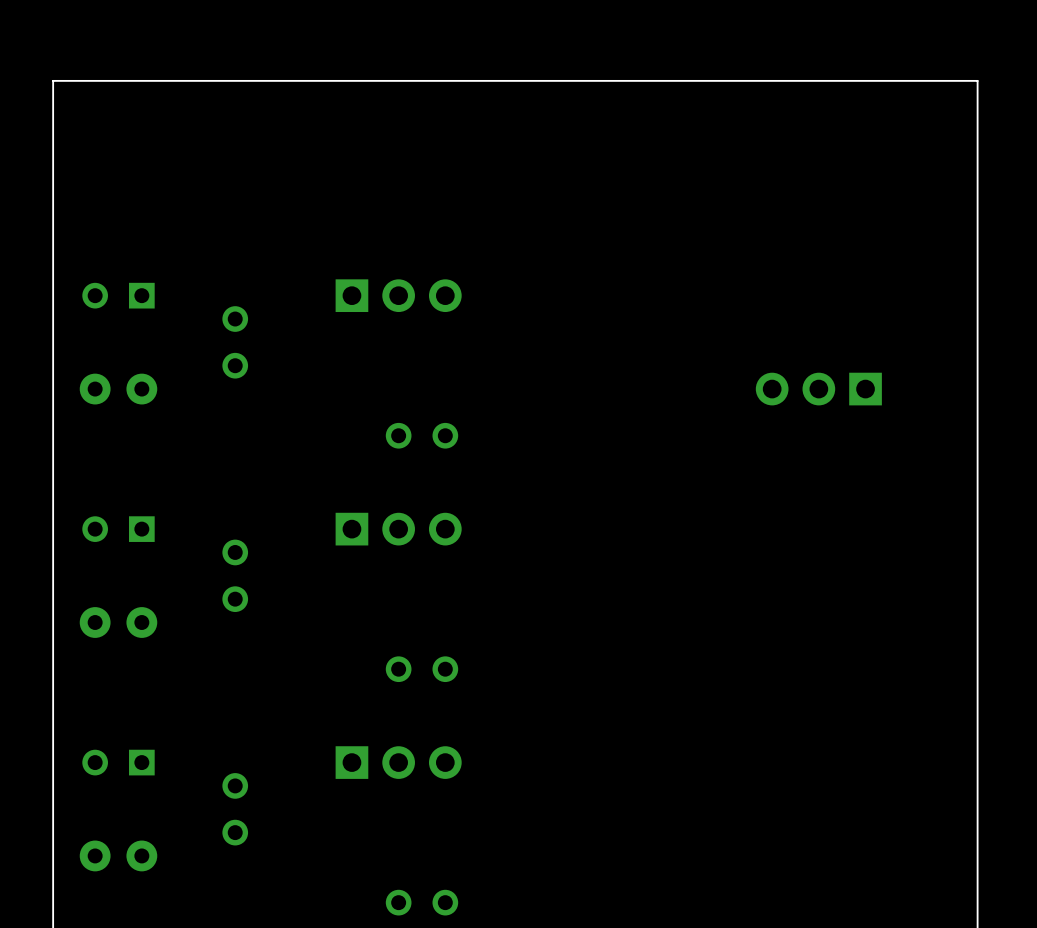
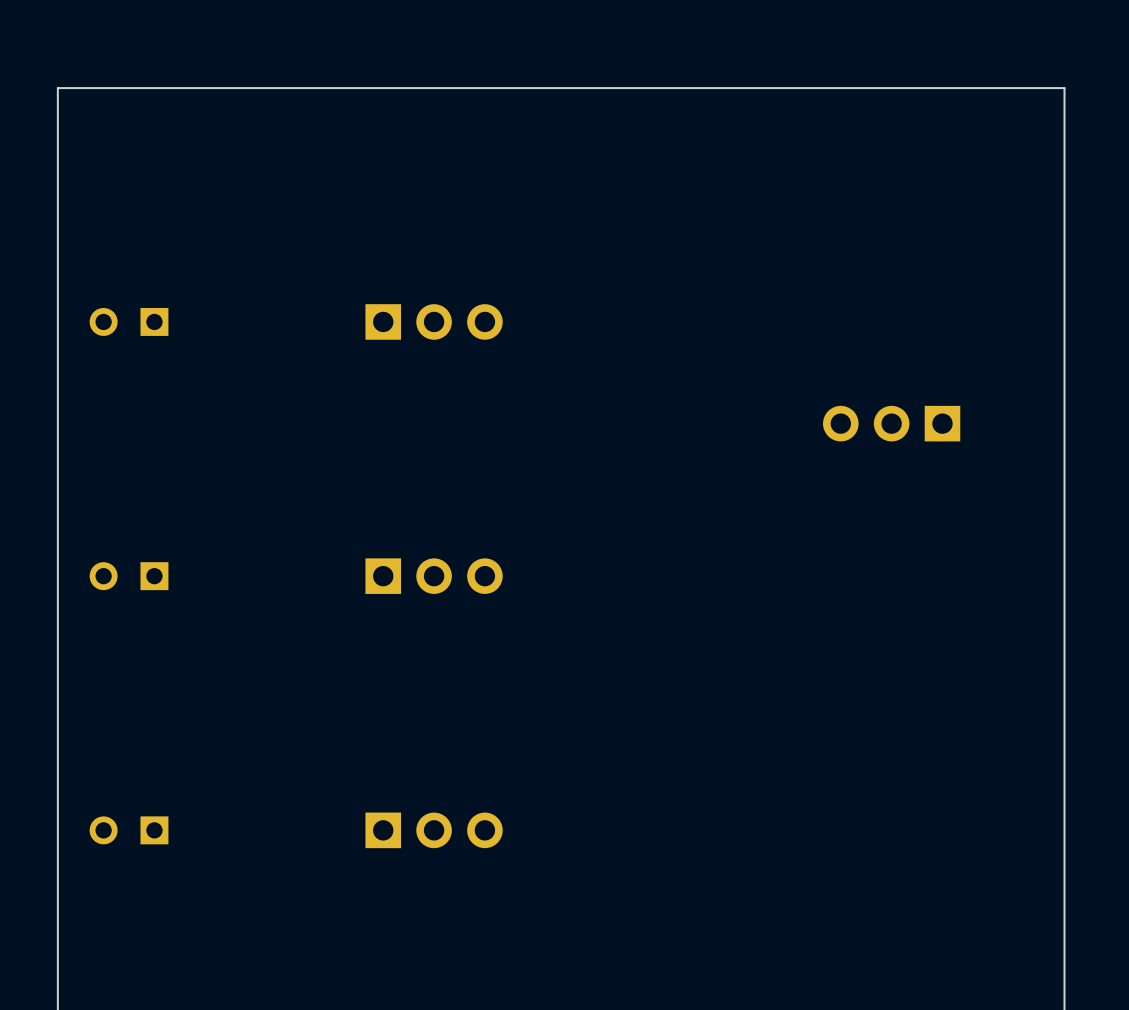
part: (235, 342) -> none
part: (118, 389) -> none
part: (421, 435) -> none
part: (235, 575) -> none
part: (118, 622) -> none
part: (421, 669) -> none
part: (235, 809) -> none
part: (118, 855) -> none
part: (421, 902) -> none

